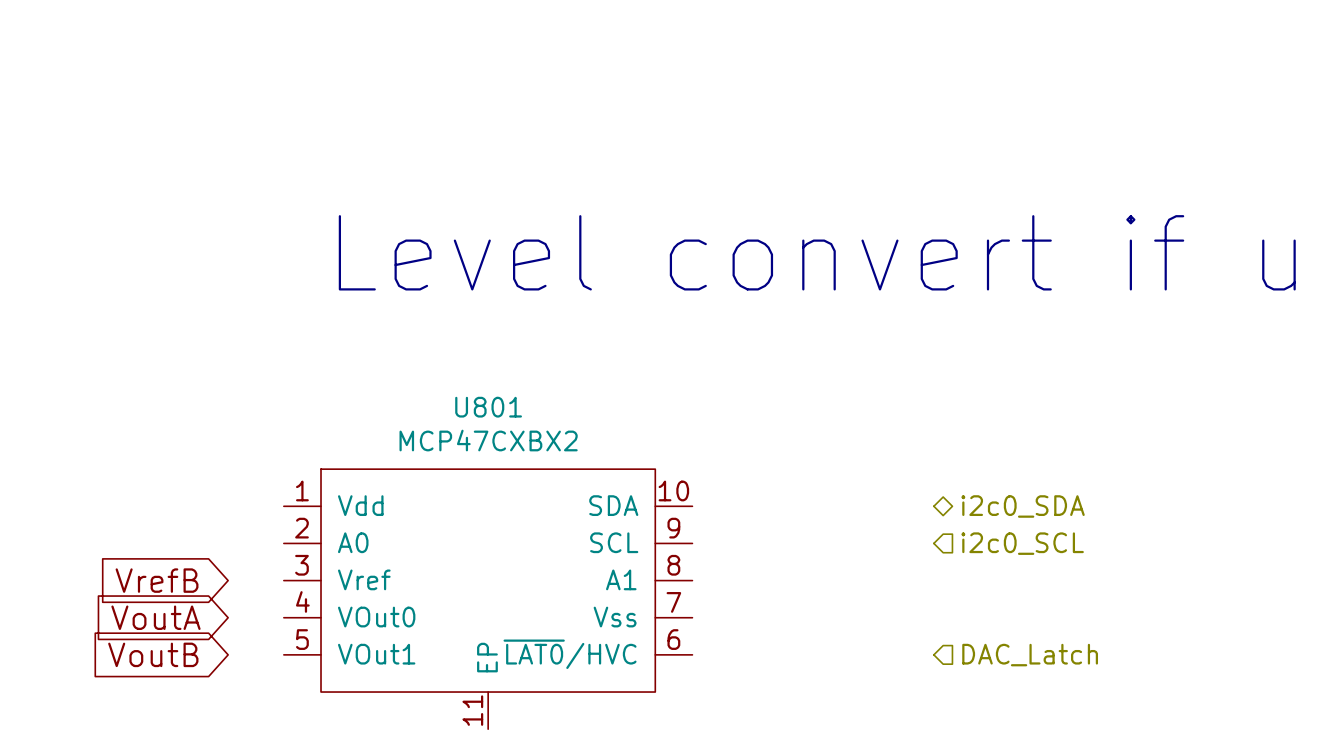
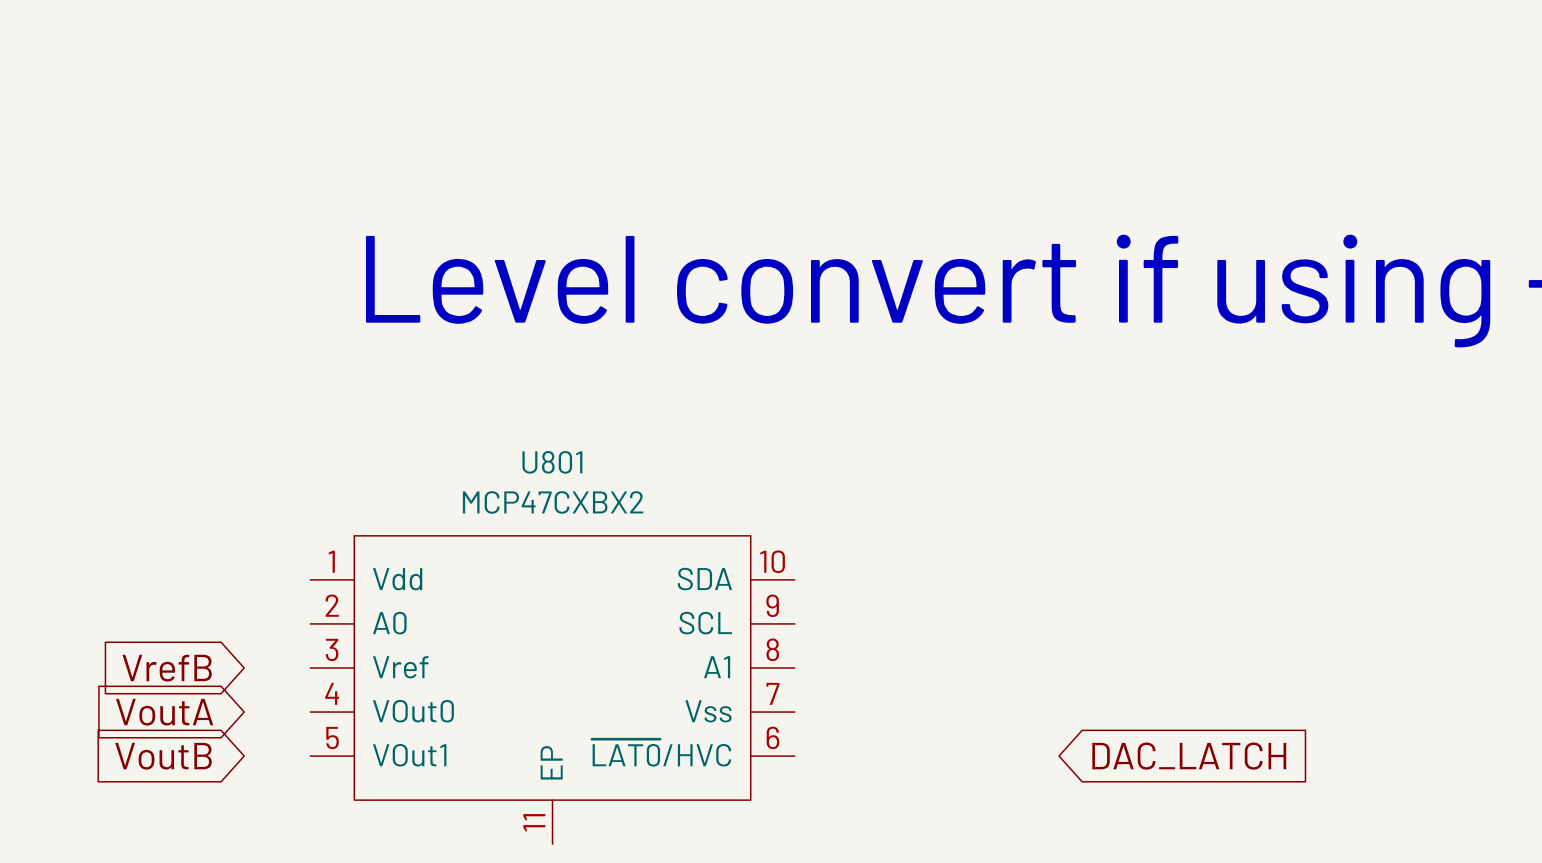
hierarchical label: i2c0_SDA (1023, 506) -> none
hierarchical label: i2c0_SCL (1022, 543) -> none
hierarchical label: DAC_Latch (1030, 655) -> none
global label: none -> DAC_LATCH (1189, 756)

